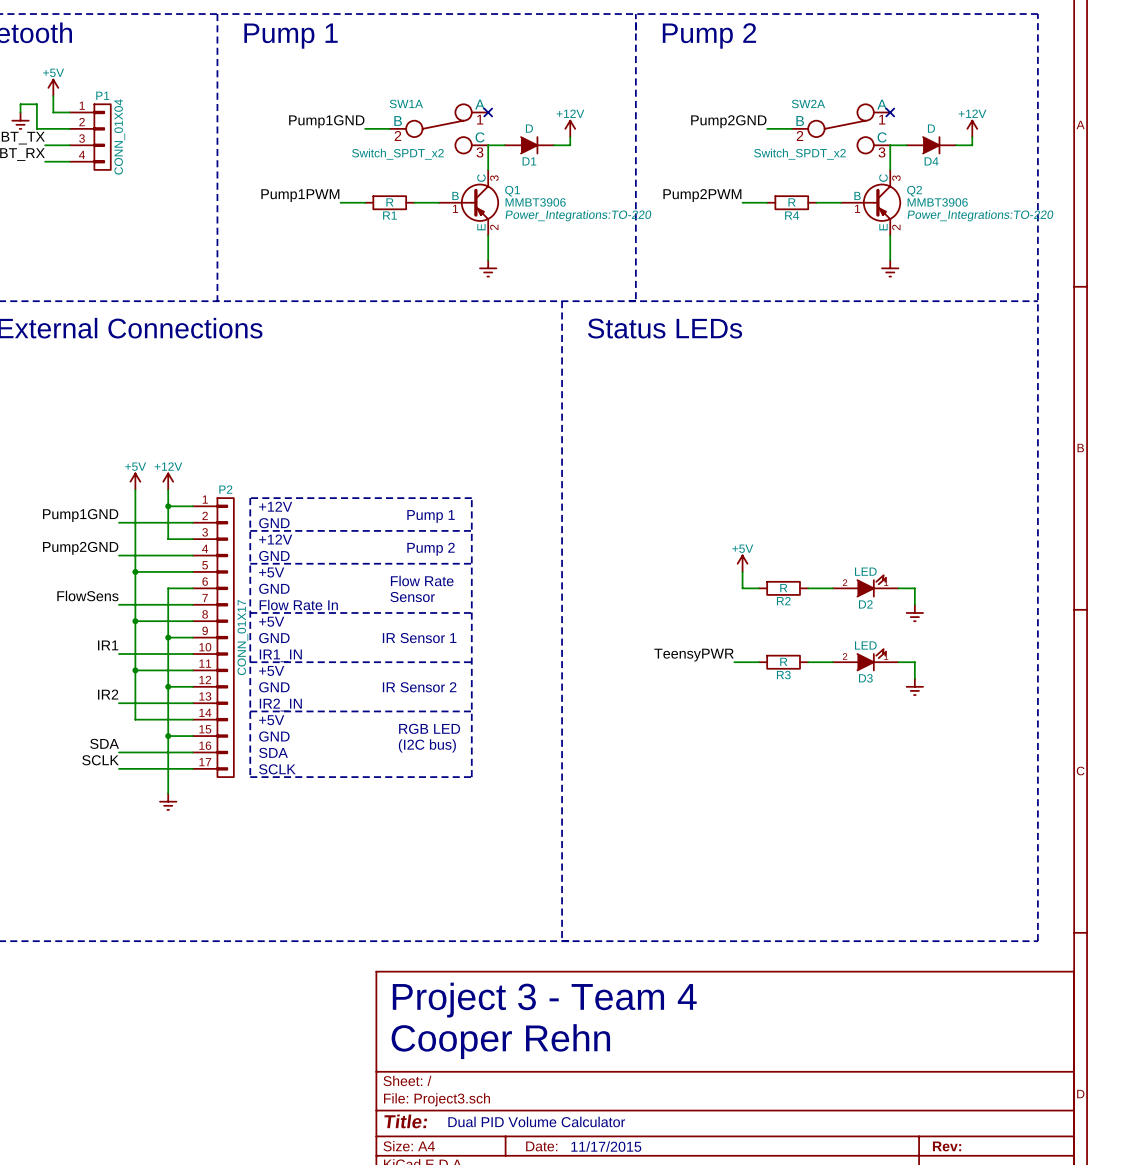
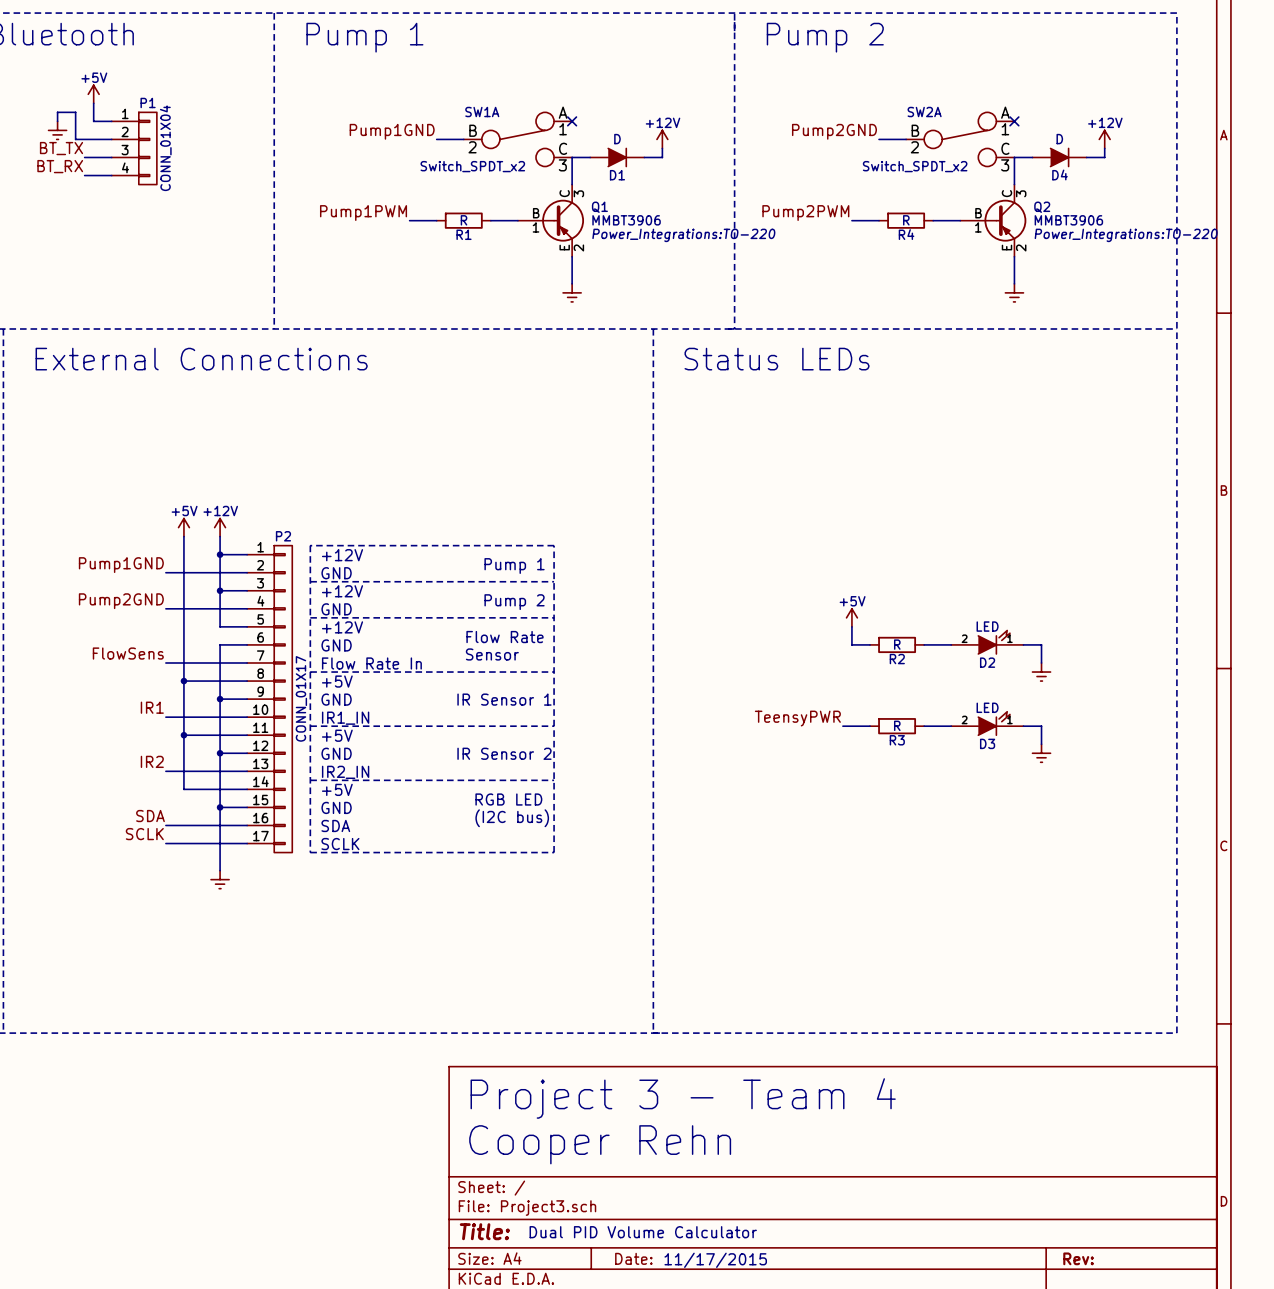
junction: none -> (220, 590)
wire: (135, 571) (168, 571) -> (220, 590) (220, 626)
junction: (135, 571) -> none
text: +5V (271, 572) -> +12V (342, 627)

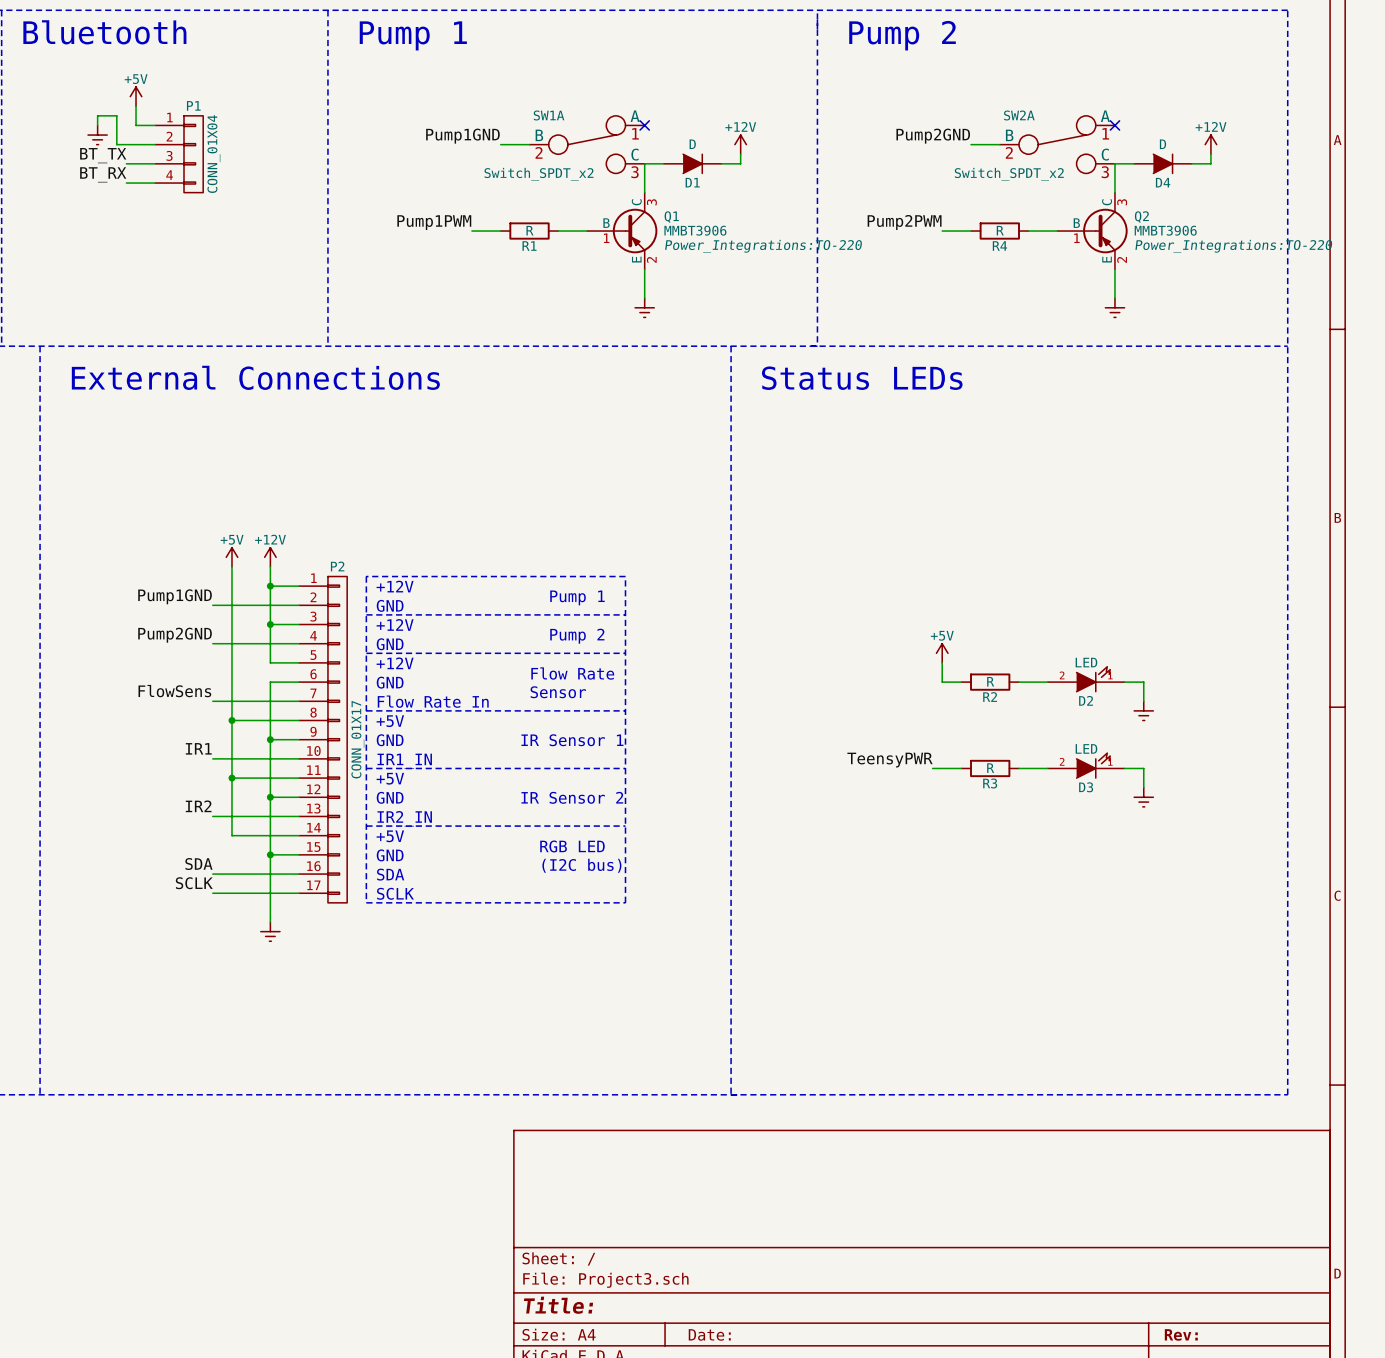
text: Project 3 - Team 4 (683, 1098) -> none
text: Cooper Rehn (600, 1144) -> none
text: Dual PID Volume Calculator (643, 1232) -> none
text: 11/17/2015 (715, 1260) -> none

